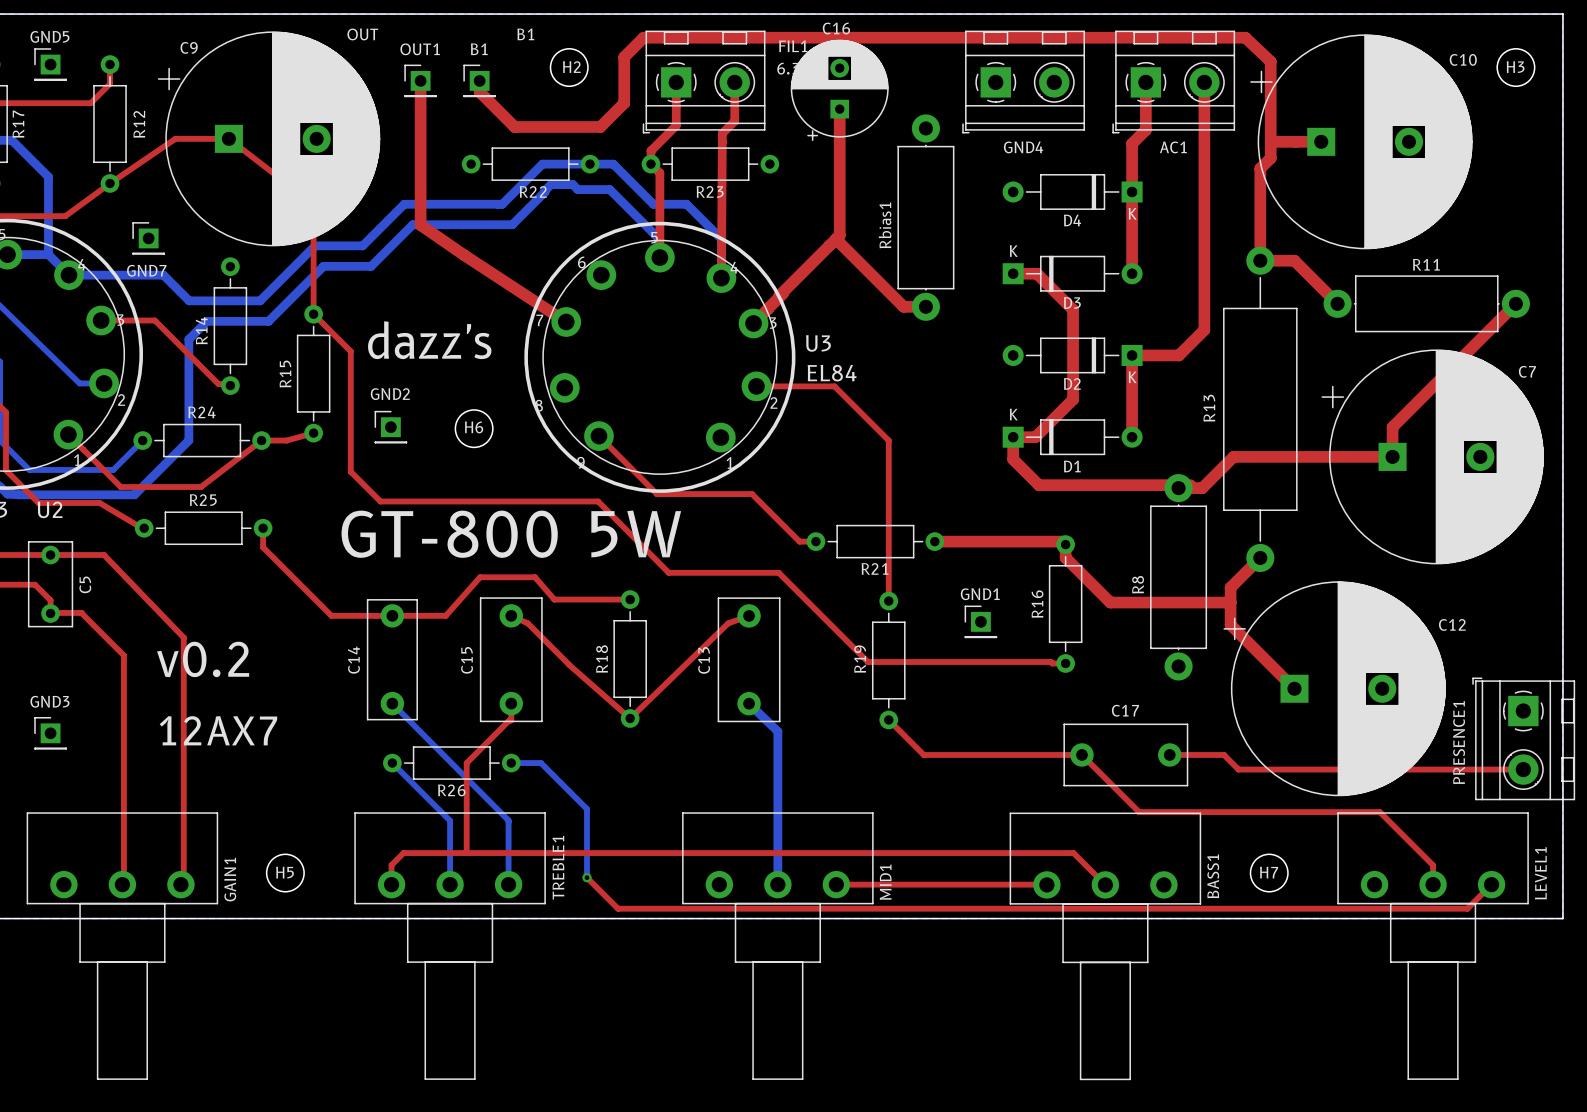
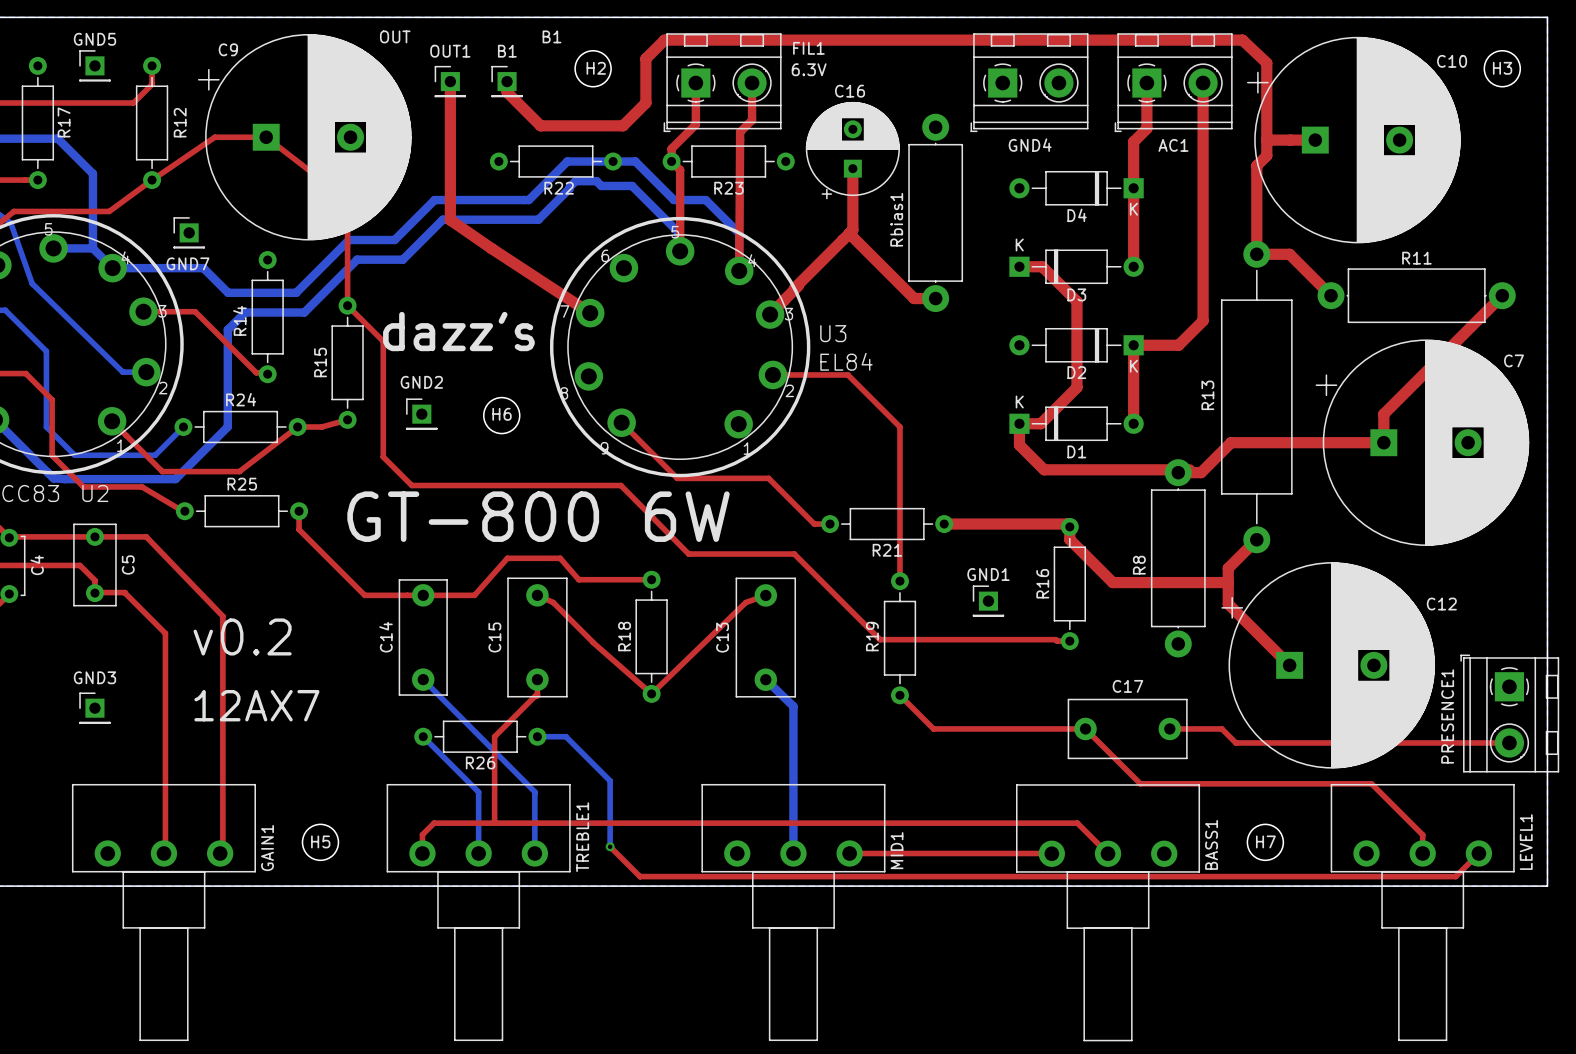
C16 position: (839, 90) -> (852, 150)
top track: (839, 109) (839, 171) -> none
text: GT-800 5W (511, 534) -> GT-800 6W (538, 516)

